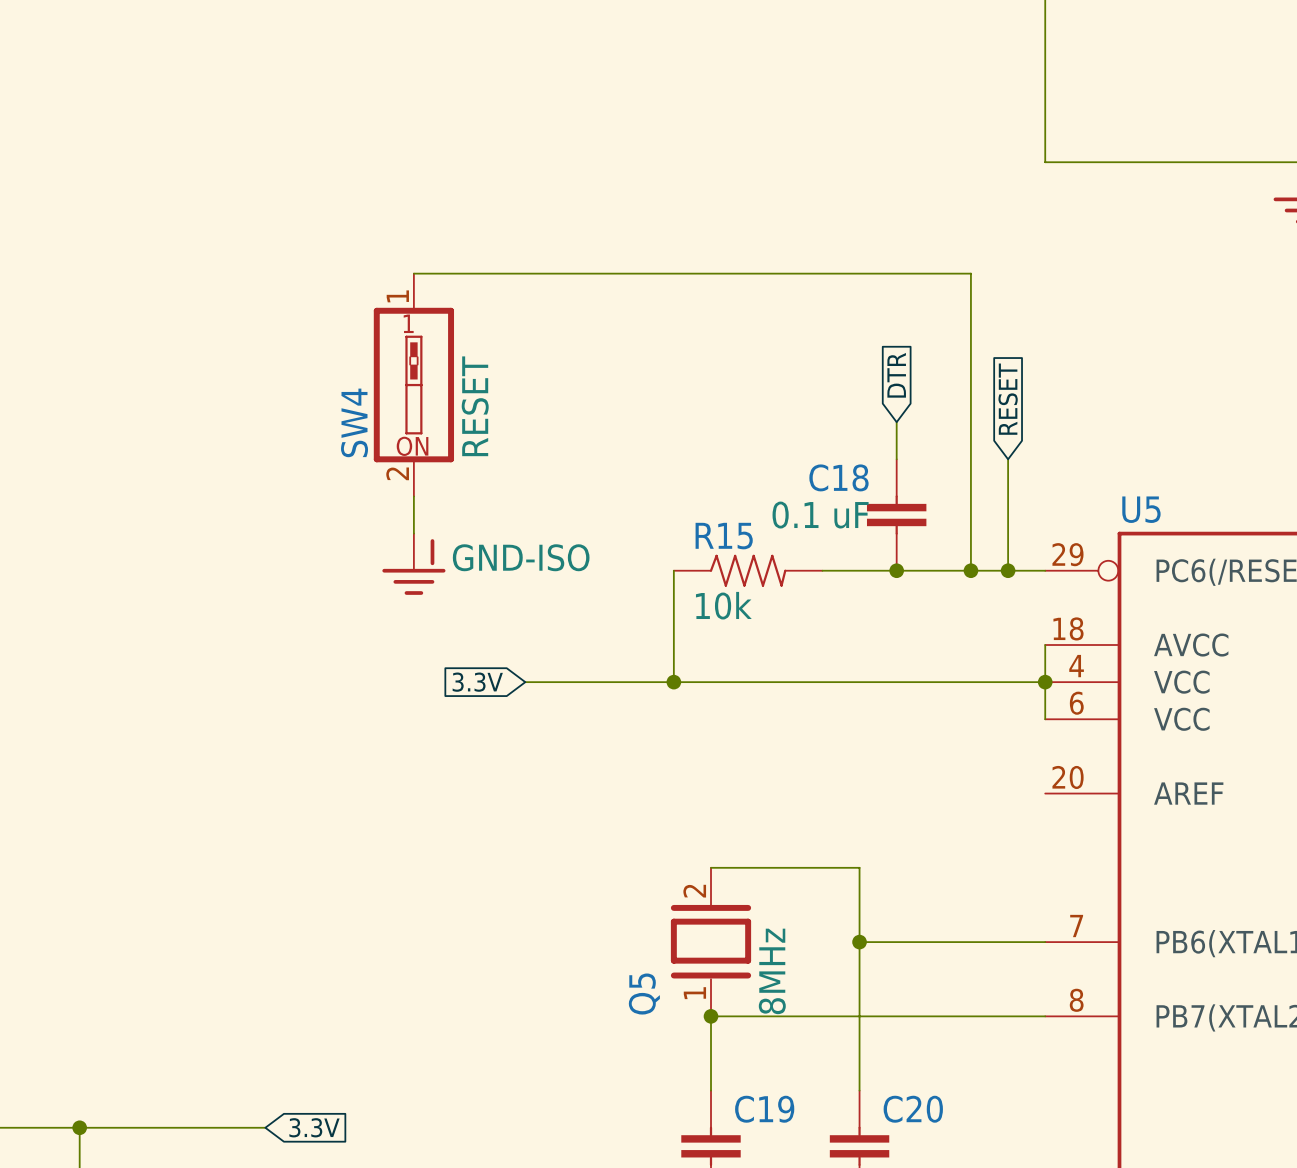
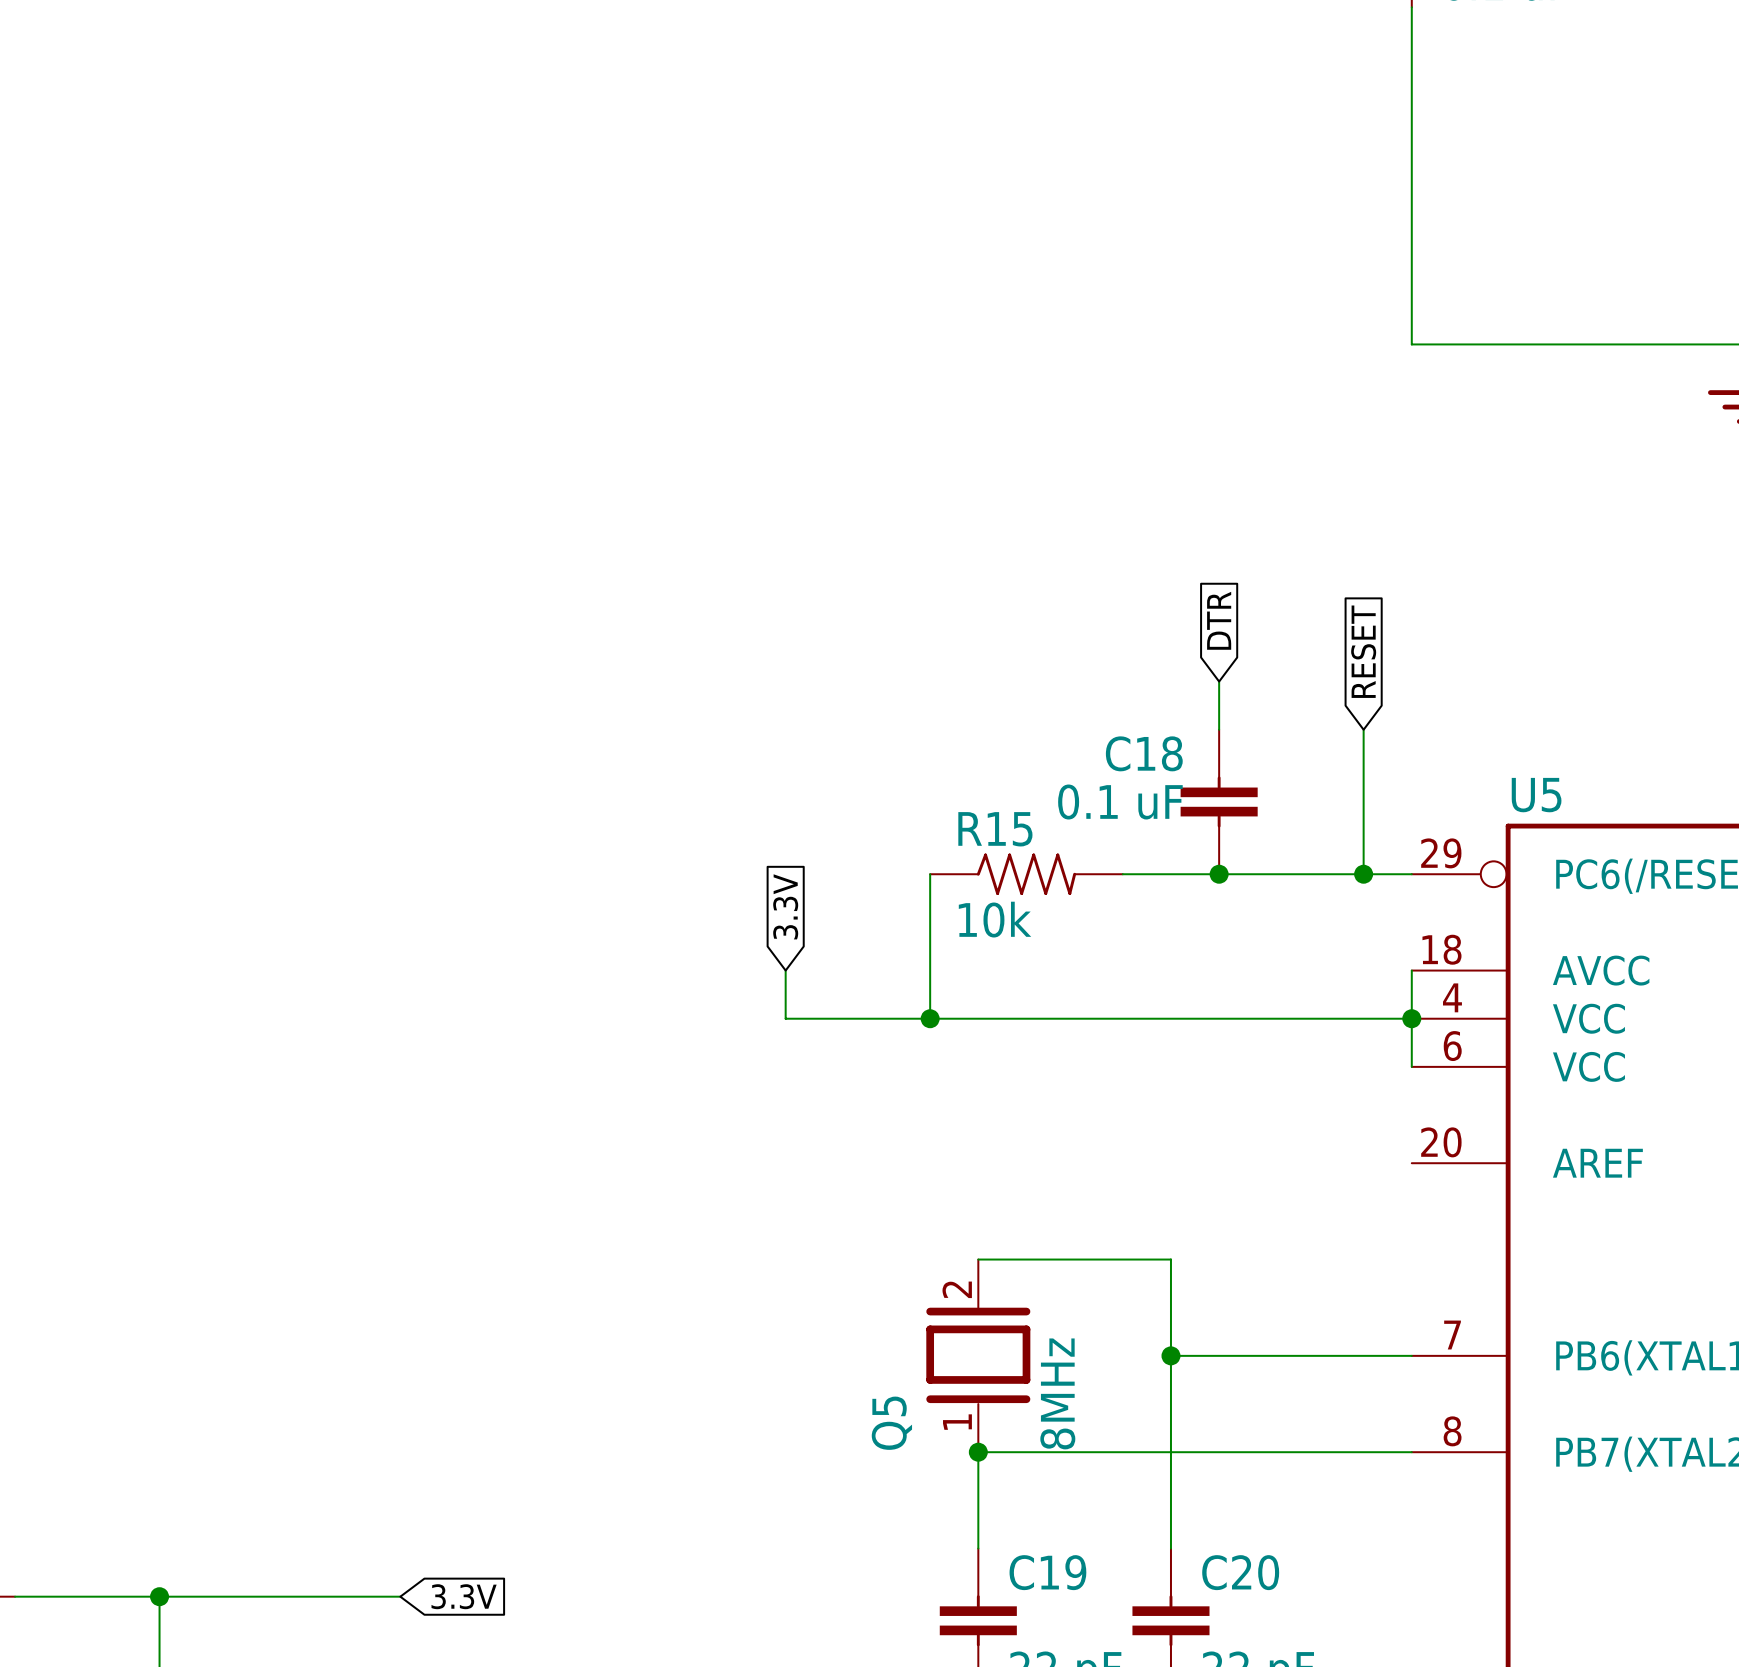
wire: (413, 273) (970, 273) (970, 570) -> none
SW4: RESET (413, 385) -> none
wire: (413, 496) (413, 533) -> none
power symbol: GND-ISO (413, 564) -> none
junction: (970, 570) -> none
global label rotation: 0° (477, 682) -> 90° clockwise (785, 906)
global label position: 3.3V (477, 682) -> 3.3V (785, 906)
wire: (525, 682) (562, 682) -> (785, 970) (785, 1018)

